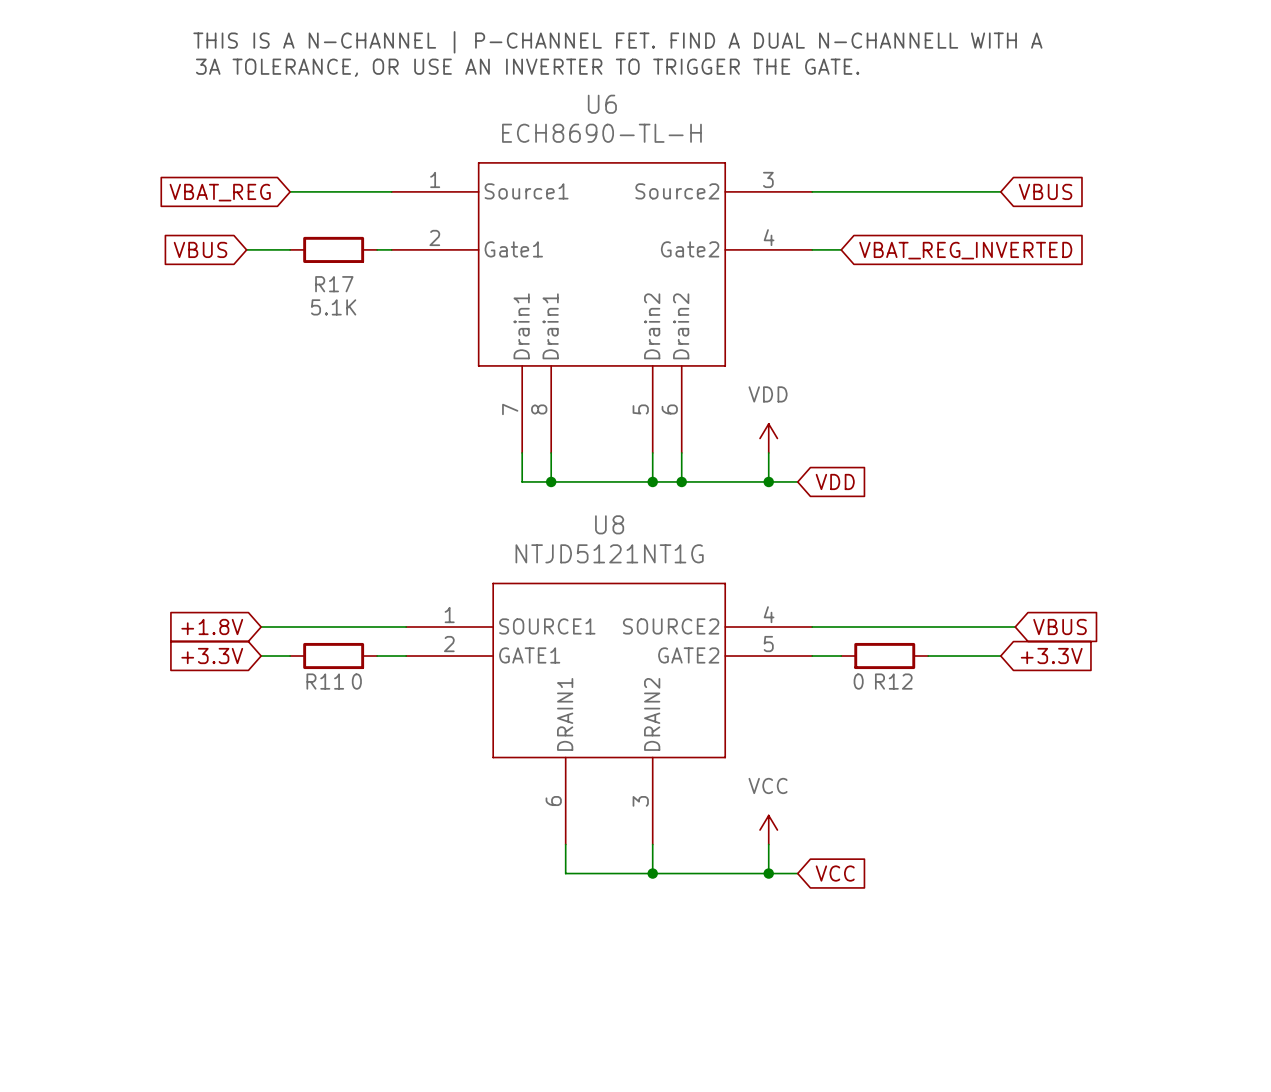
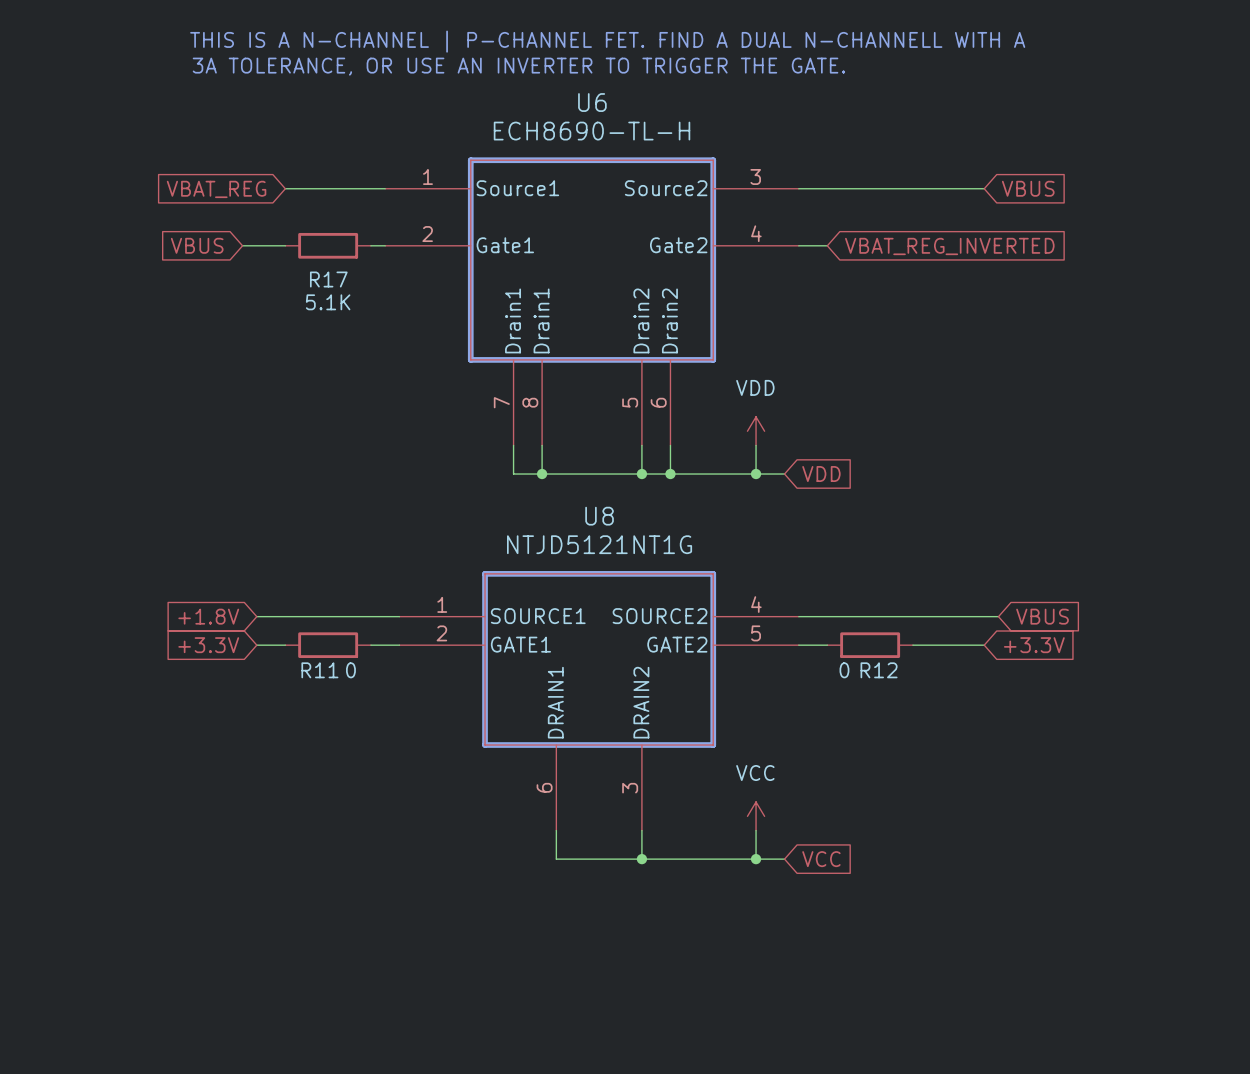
line: none -> (470, 160) (713, 160) (713, 359) (470, 359) (470, 160)
line: none -> (485, 573) (713, 573) (713, 745) (485, 745) (485, 573)

